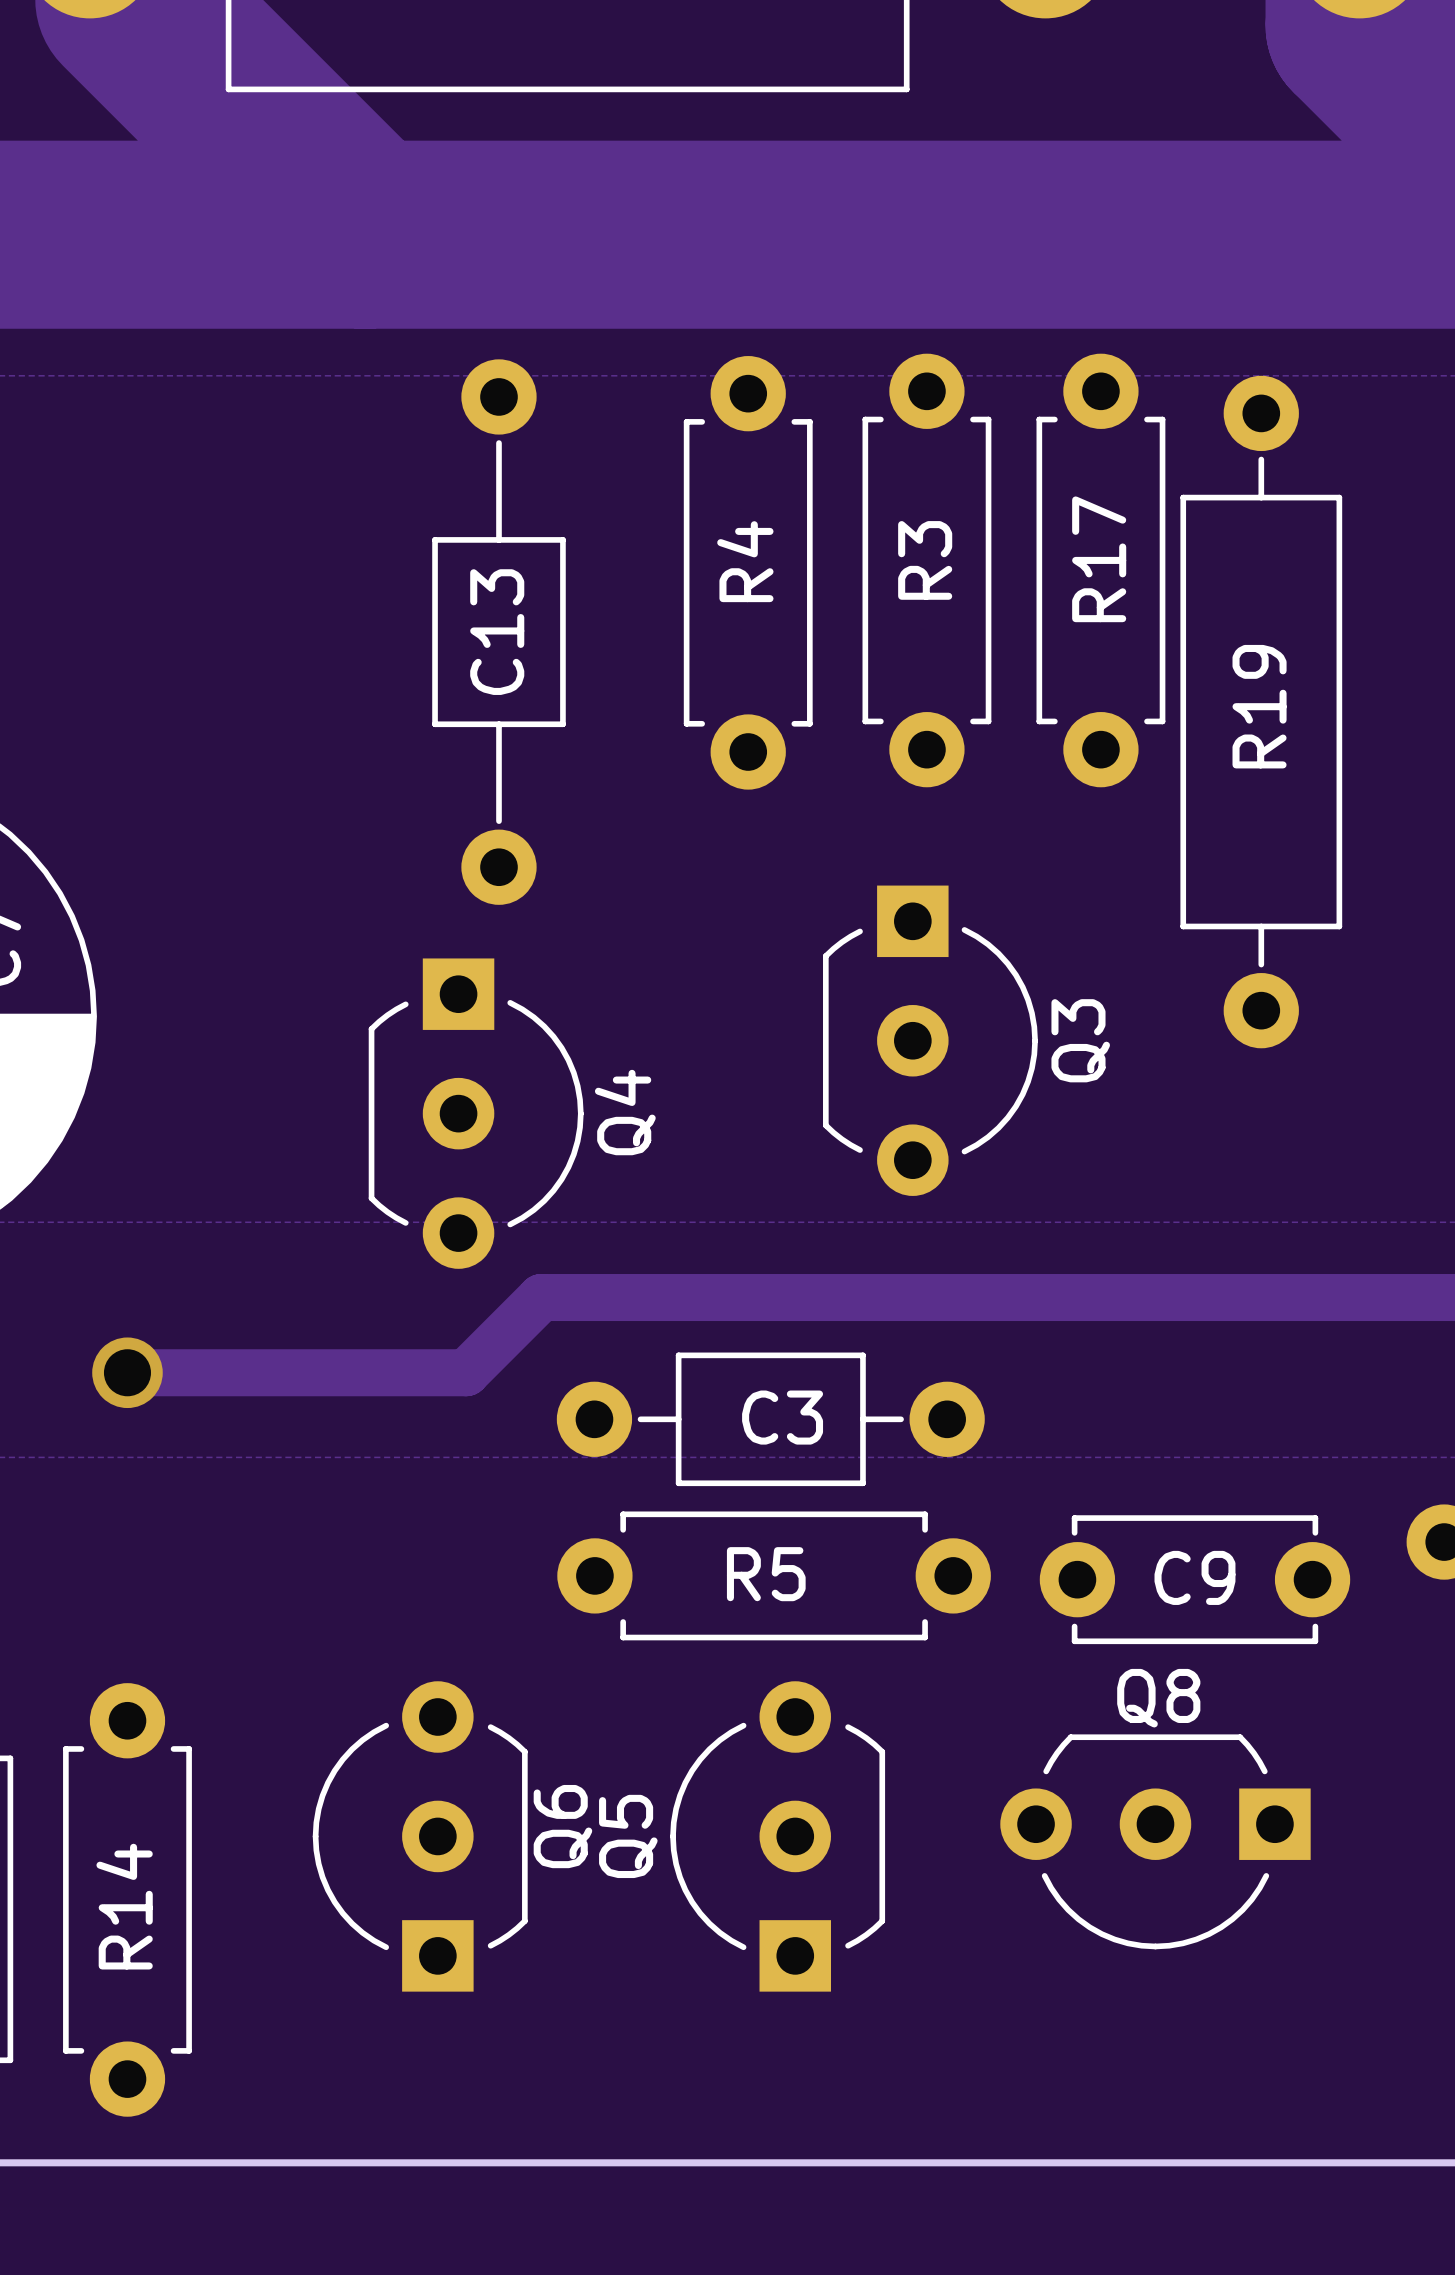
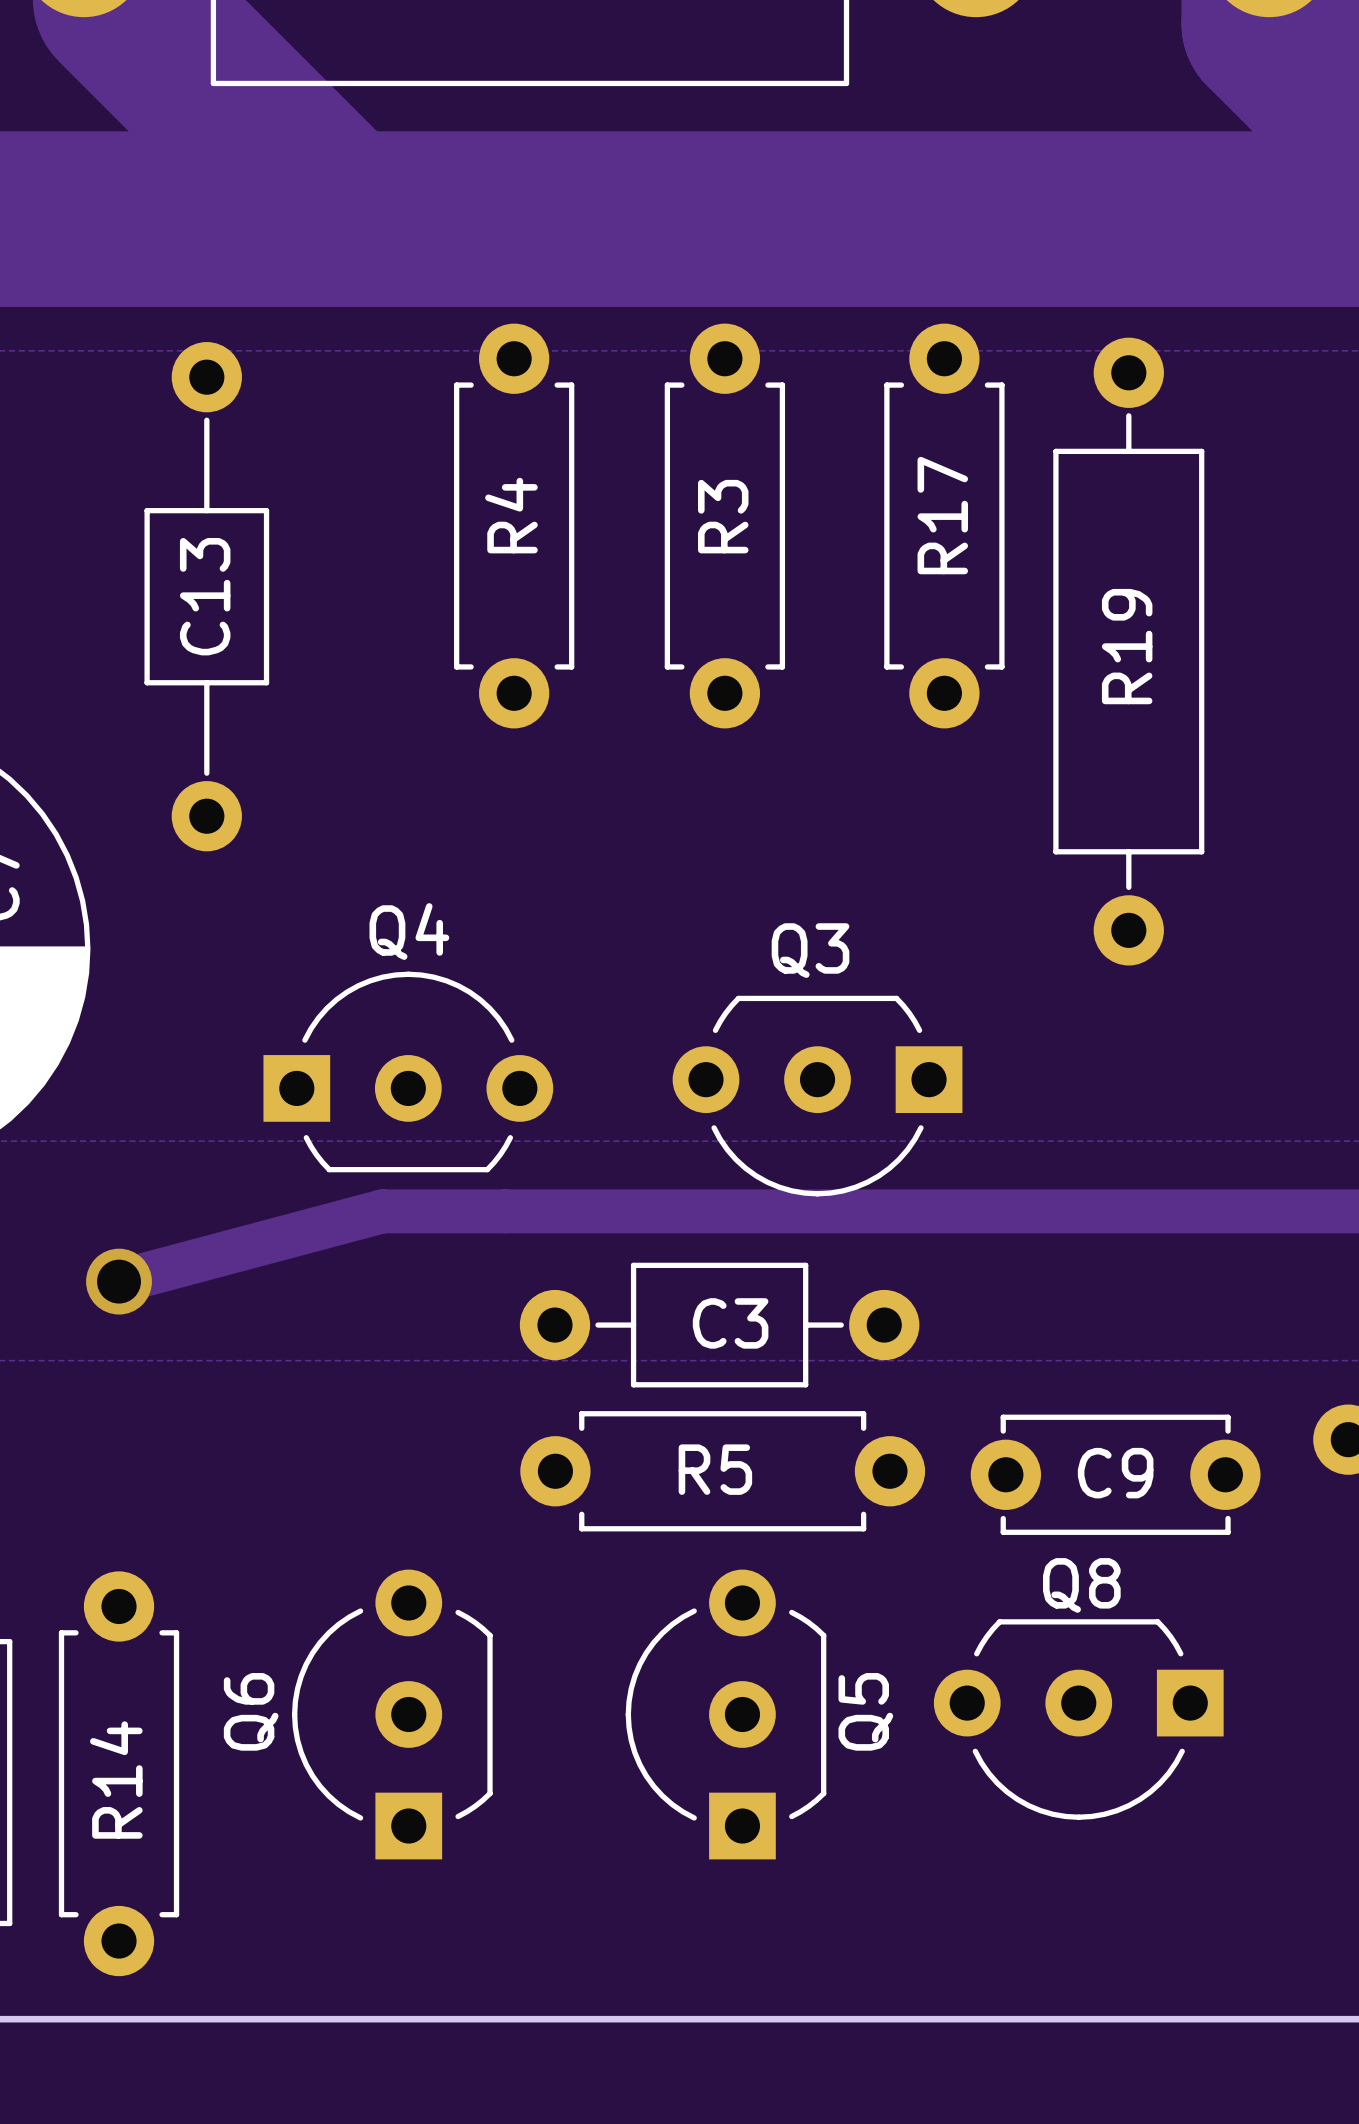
R3 position: (926, 570) -> (724, 526)
R17 position: (1100, 570) -> (944, 526)
R4 position: (748, 572) -> (514, 526)
C13 position: (498, 632) -> (206, 596)
R19 position: (1261, 712) -> (1128, 651)
Q3 rotation: 0° (930, 1040) -> 90° clockwise (817, 1096)
Q3 name position: Q3 (1080, 1040) -> Q3 (810, 950)
Q4 rotation: 0° (476, 1113) -> 90° counterclockwise (408, 1071)
track: (541, 1297) (466, 1372) (127, 1372) -> (505, 1211) (382, 1211) (119, 1281)
Q6 name position: Q6 (562, 1826) -> Q6 (251, 1711)
Q5 name position: Q5 (628, 1836) -> Q5 (865, 1711)

